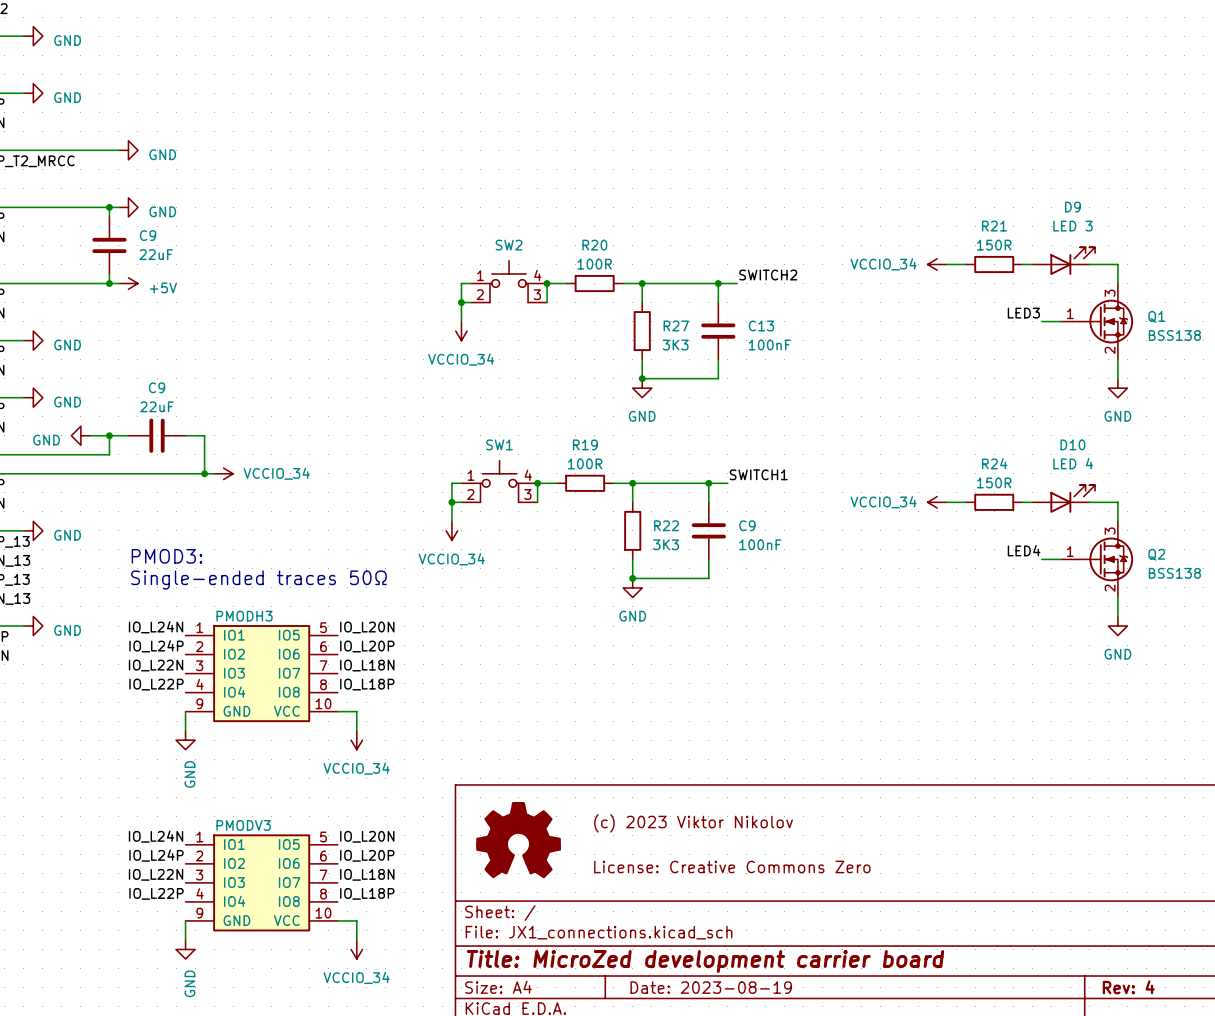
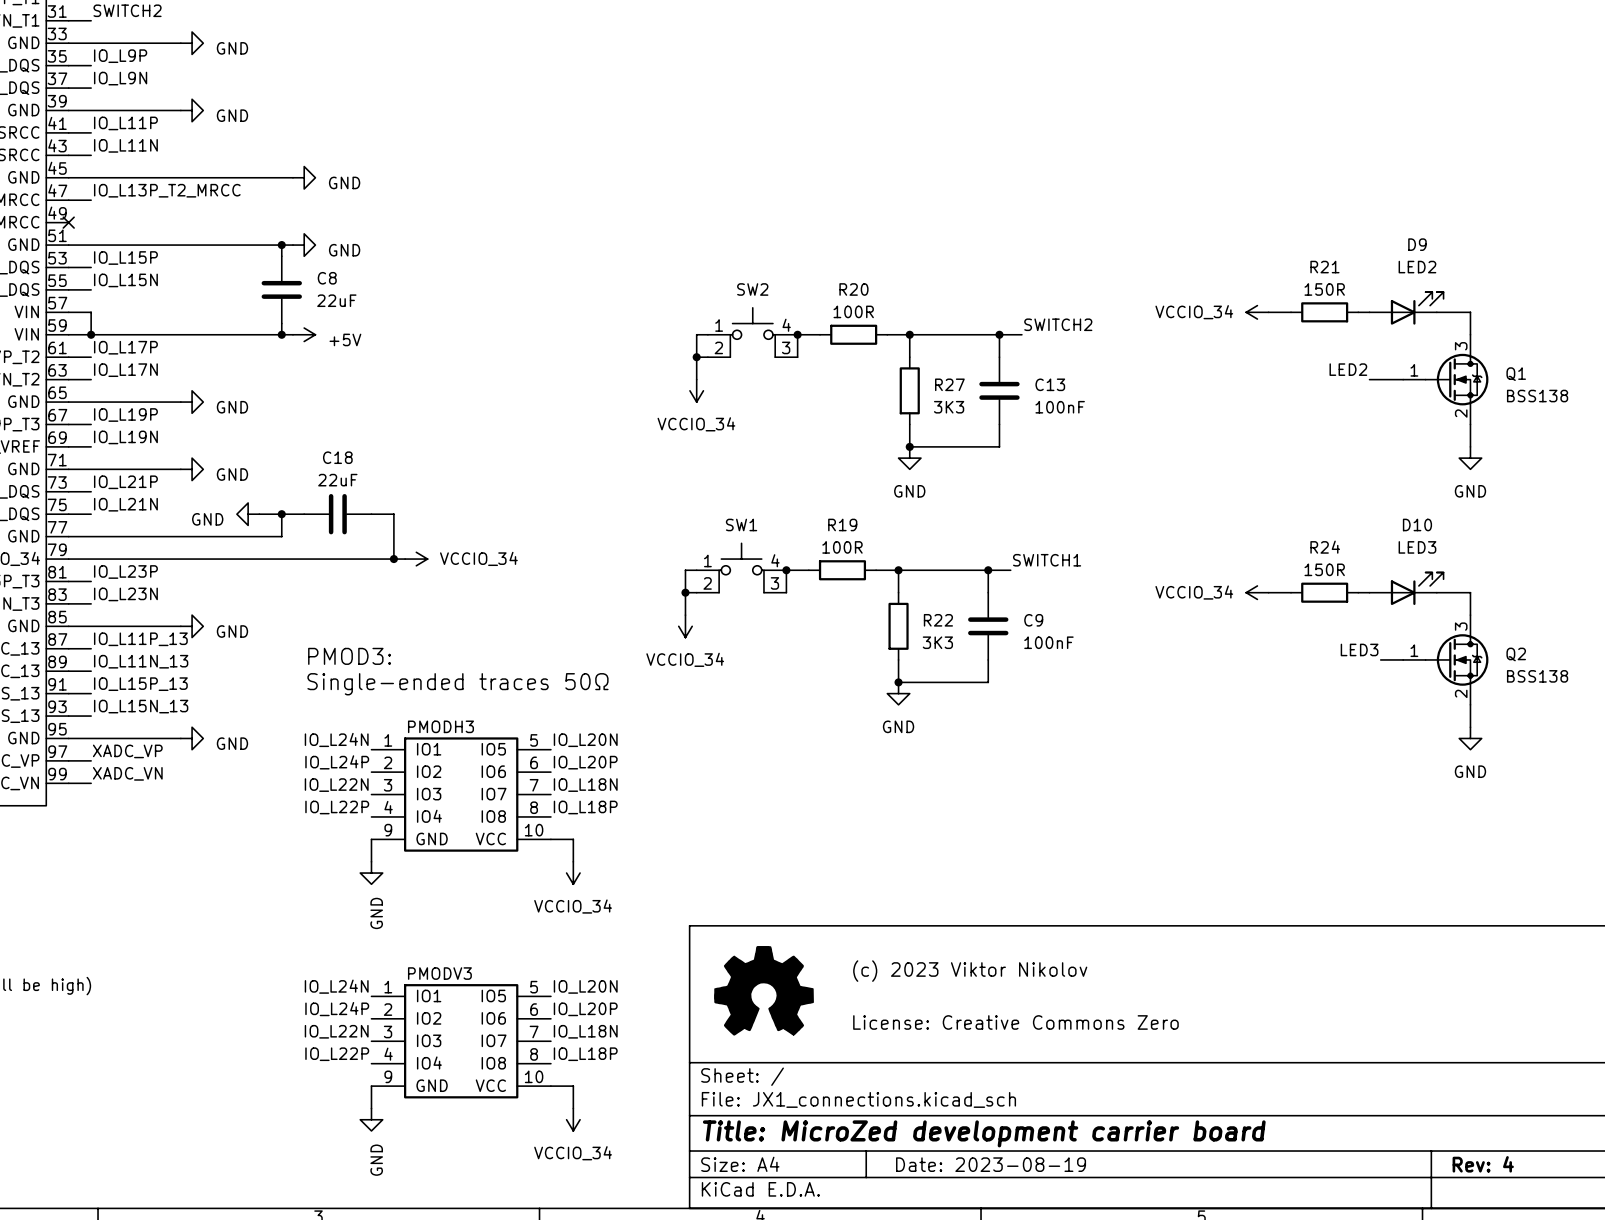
D9 value: LED 3 (1072, 226) -> LED2 (1417, 267)
C9 name: C9 (148, 235) -> C8 (327, 278)
label: LED3 (1023, 313) -> LED2 (1348, 369)
wire: none -> (1369, 379) (1380, 379)
C9 name: C9 (157, 387) -> C18 (337, 457)
D10 value: LED 4 (1073, 463) -> LED3 (1417, 547)
label: LED4 (1024, 550) -> LED3 (1359, 649)

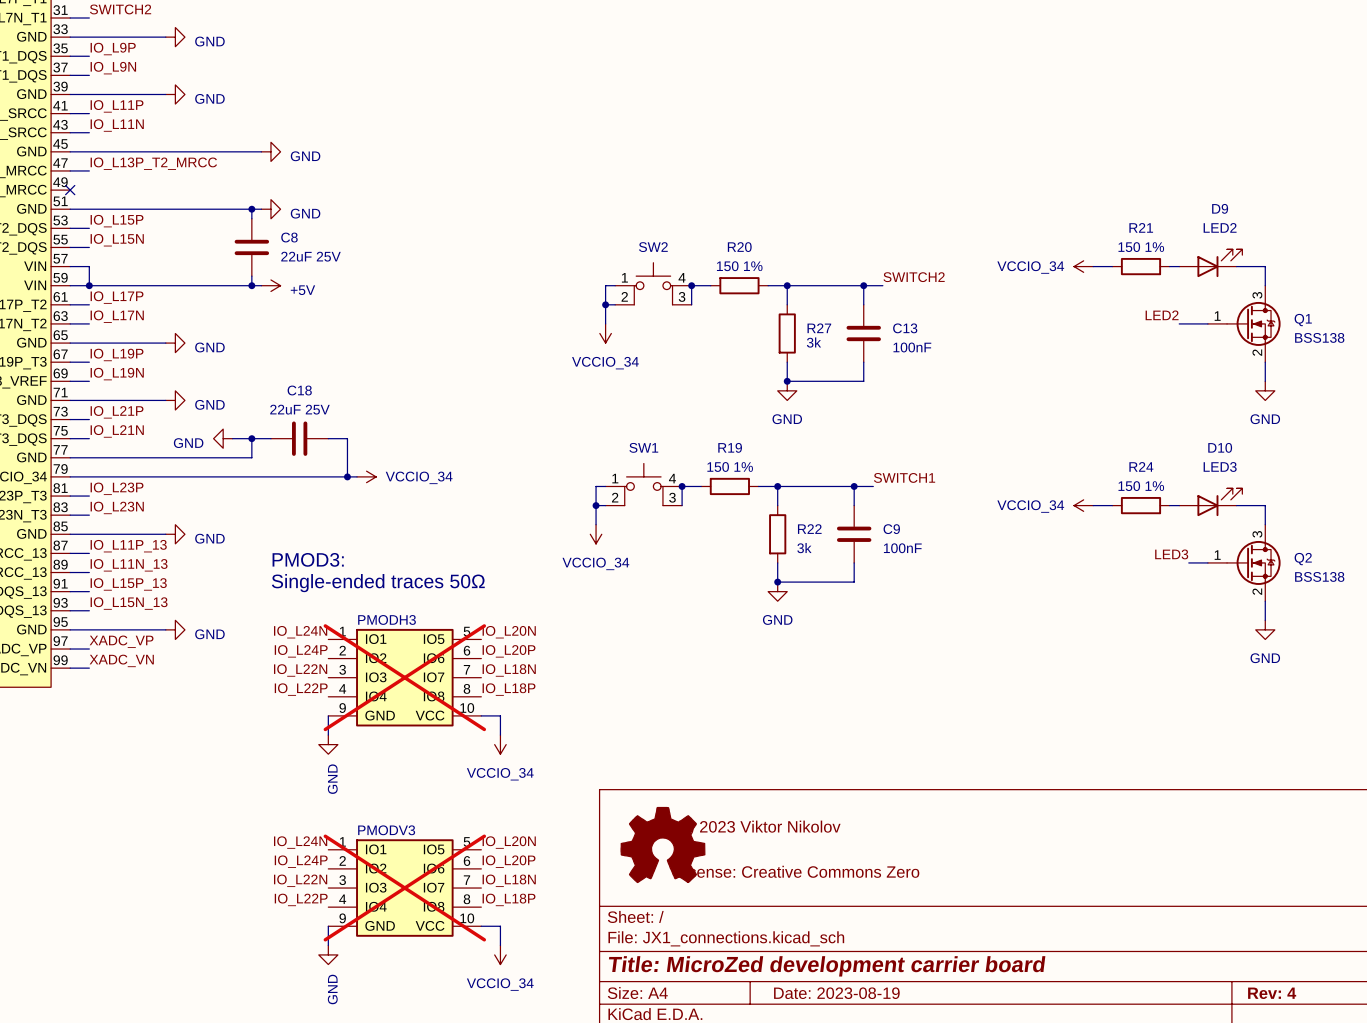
R21 value: 150R (1324, 289) -> 150 1% (1141, 247)
C8 value: 22uF (336, 300) -> 22uF 25V (310, 256)
R20 value: 100R (853, 311) -> 150 1% (739, 266)
R27 value: 3K3 (949, 407) -> 3k (813, 342)
C18 value: 22uF (337, 480) -> 22uF 25V (299, 409)
R19 value: 100R (842, 547) -> 150 1% (730, 466)
R24 value: 150R (1324, 569) -> 150 1% (1141, 486)
R22 value: 3K3 (937, 642) -> 3k (804, 548)
PMODH3 do-not-place cross: none -> (404, 677)
PMODV3 do-not-place cross: none -> (404, 888)

